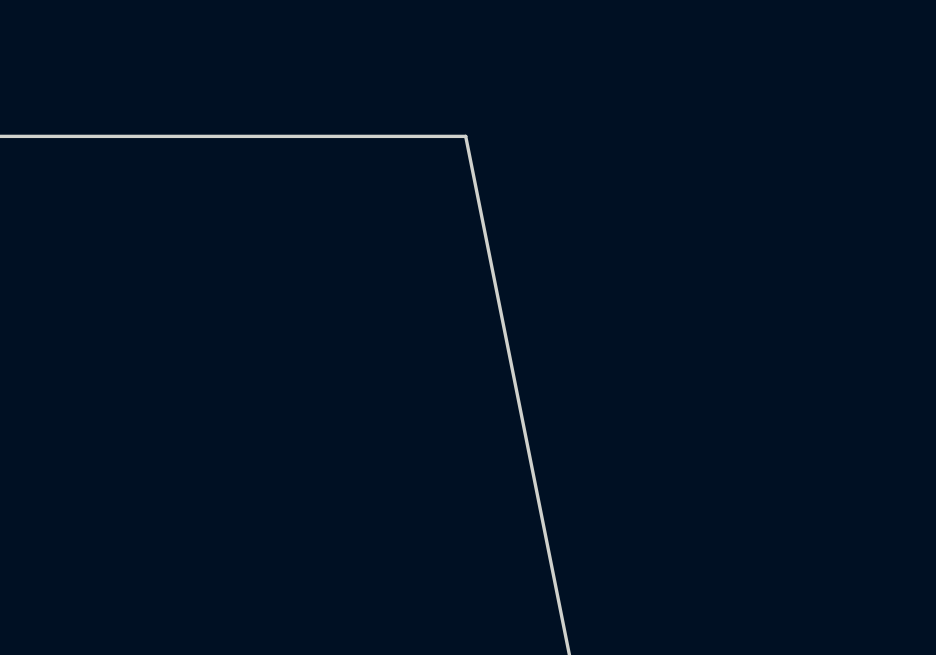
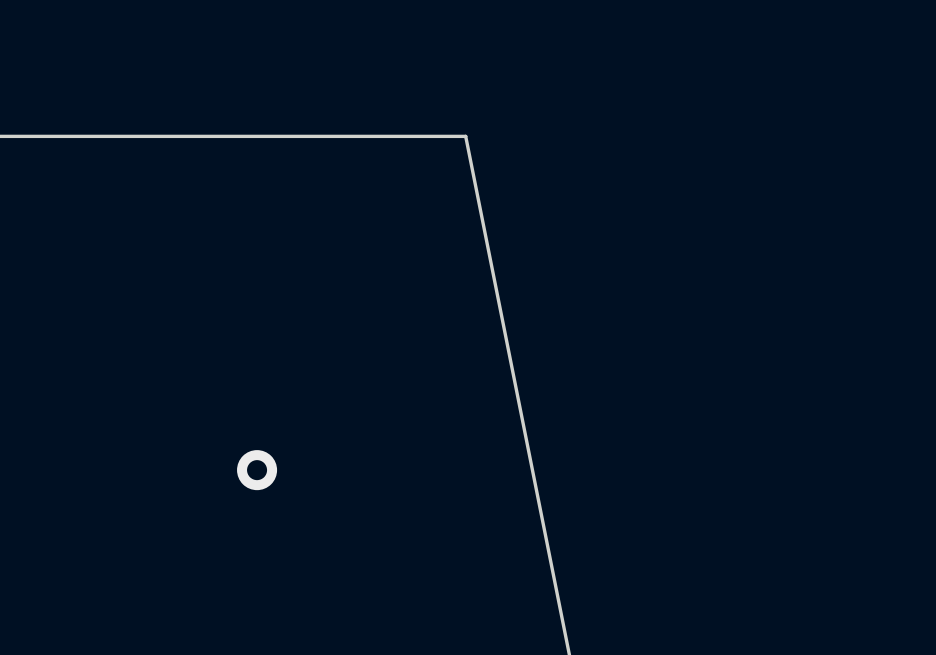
via: none -> (257, 470)

